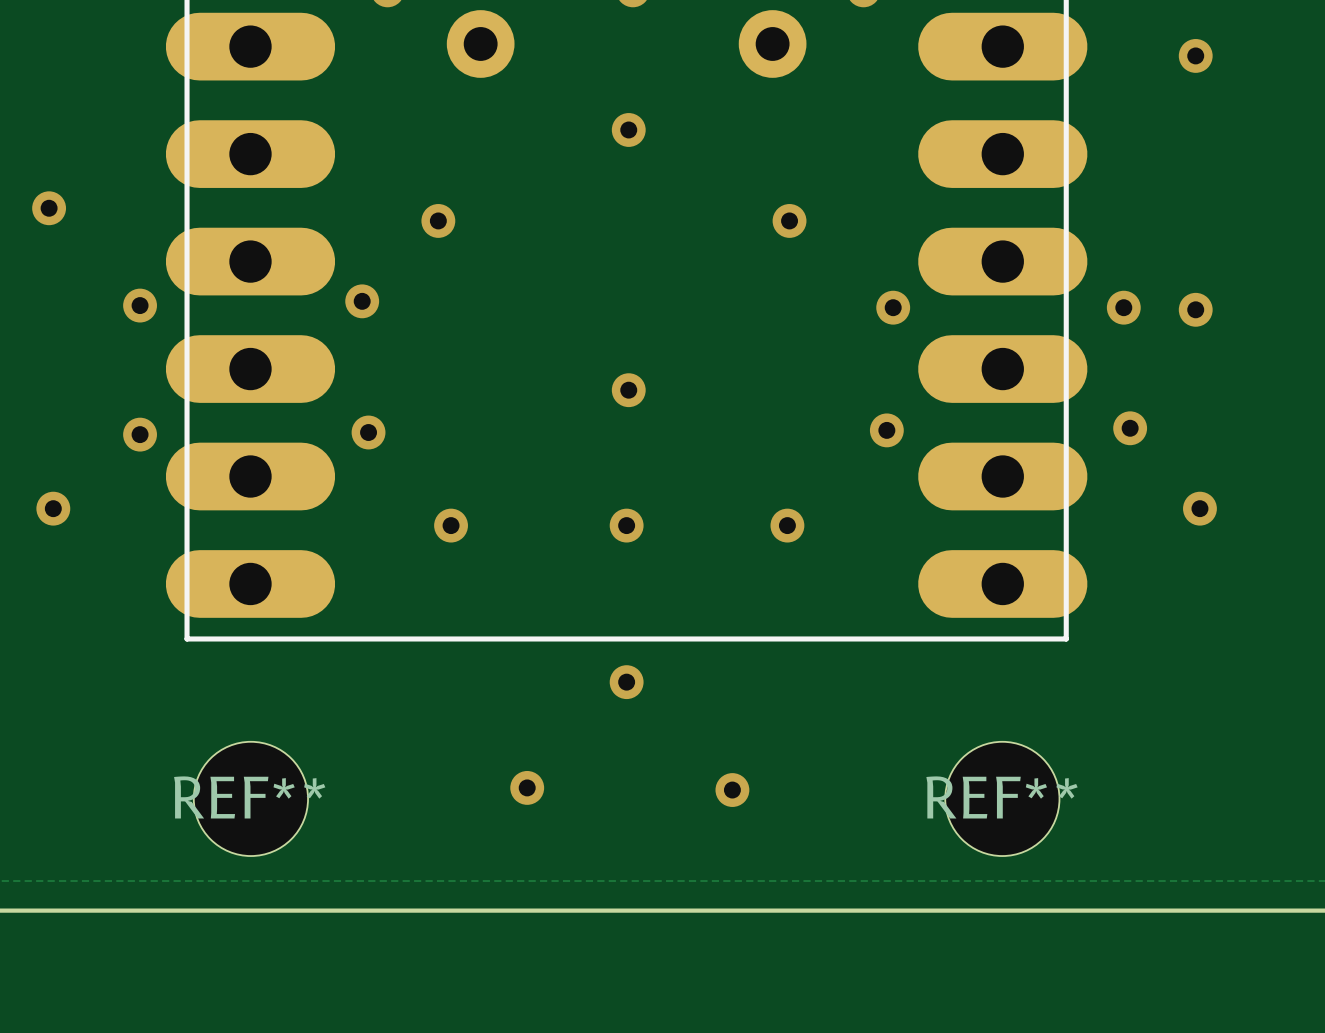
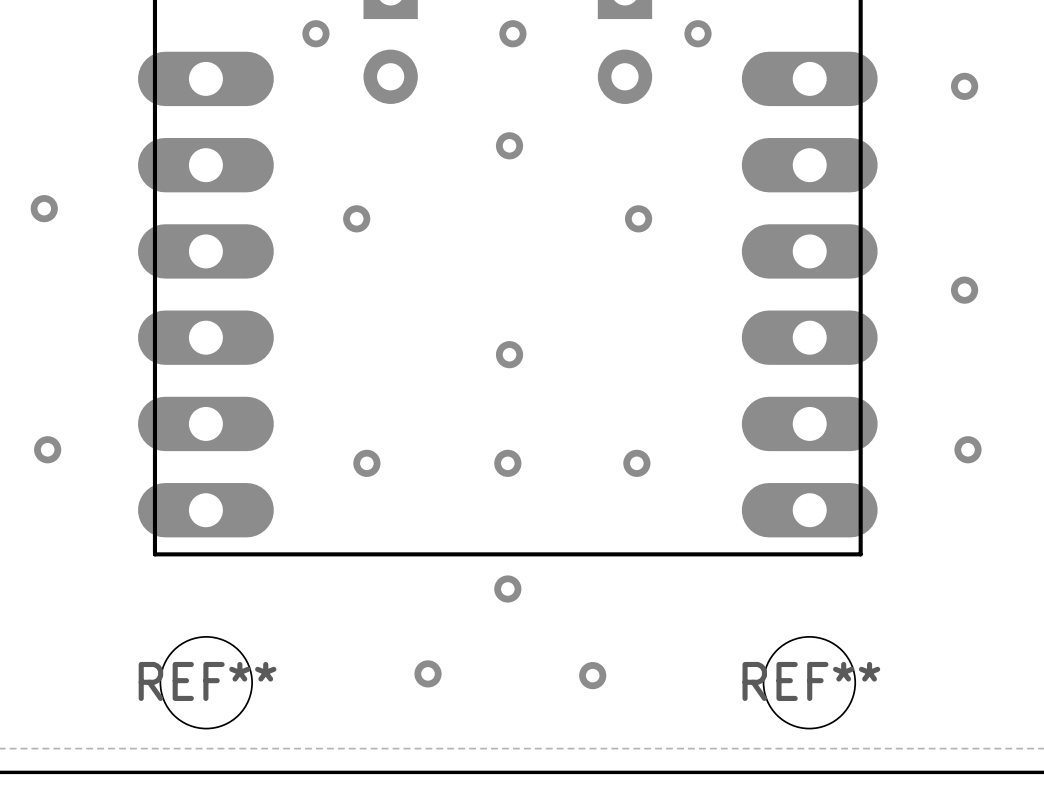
via: (362, 301) -> none
via: (140, 305) -> none
via: (893, 307) -> none
via: (1123, 307) -> none
via: (1130, 428) -> none
via: (886, 430) -> none
via: (368, 432) -> none
via: (140, 434) -> none

